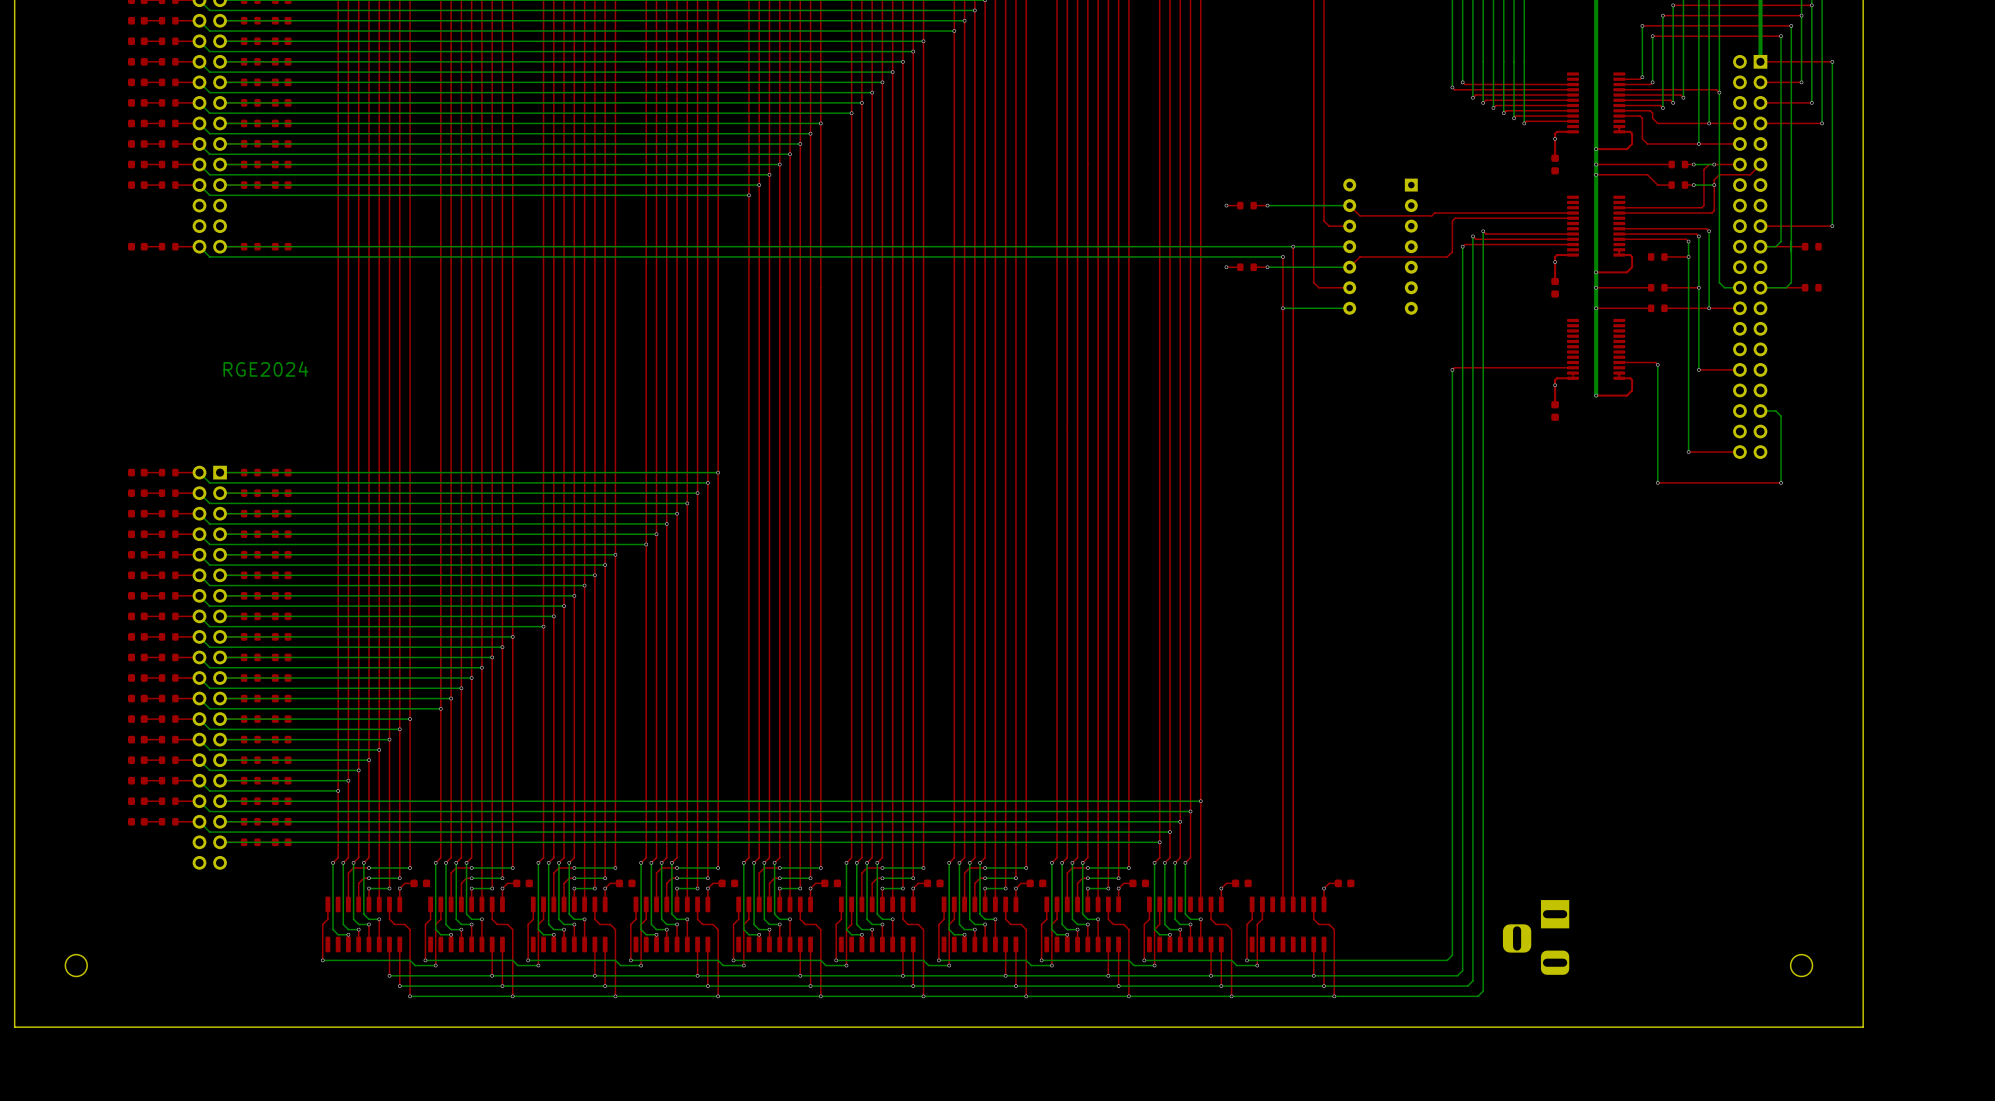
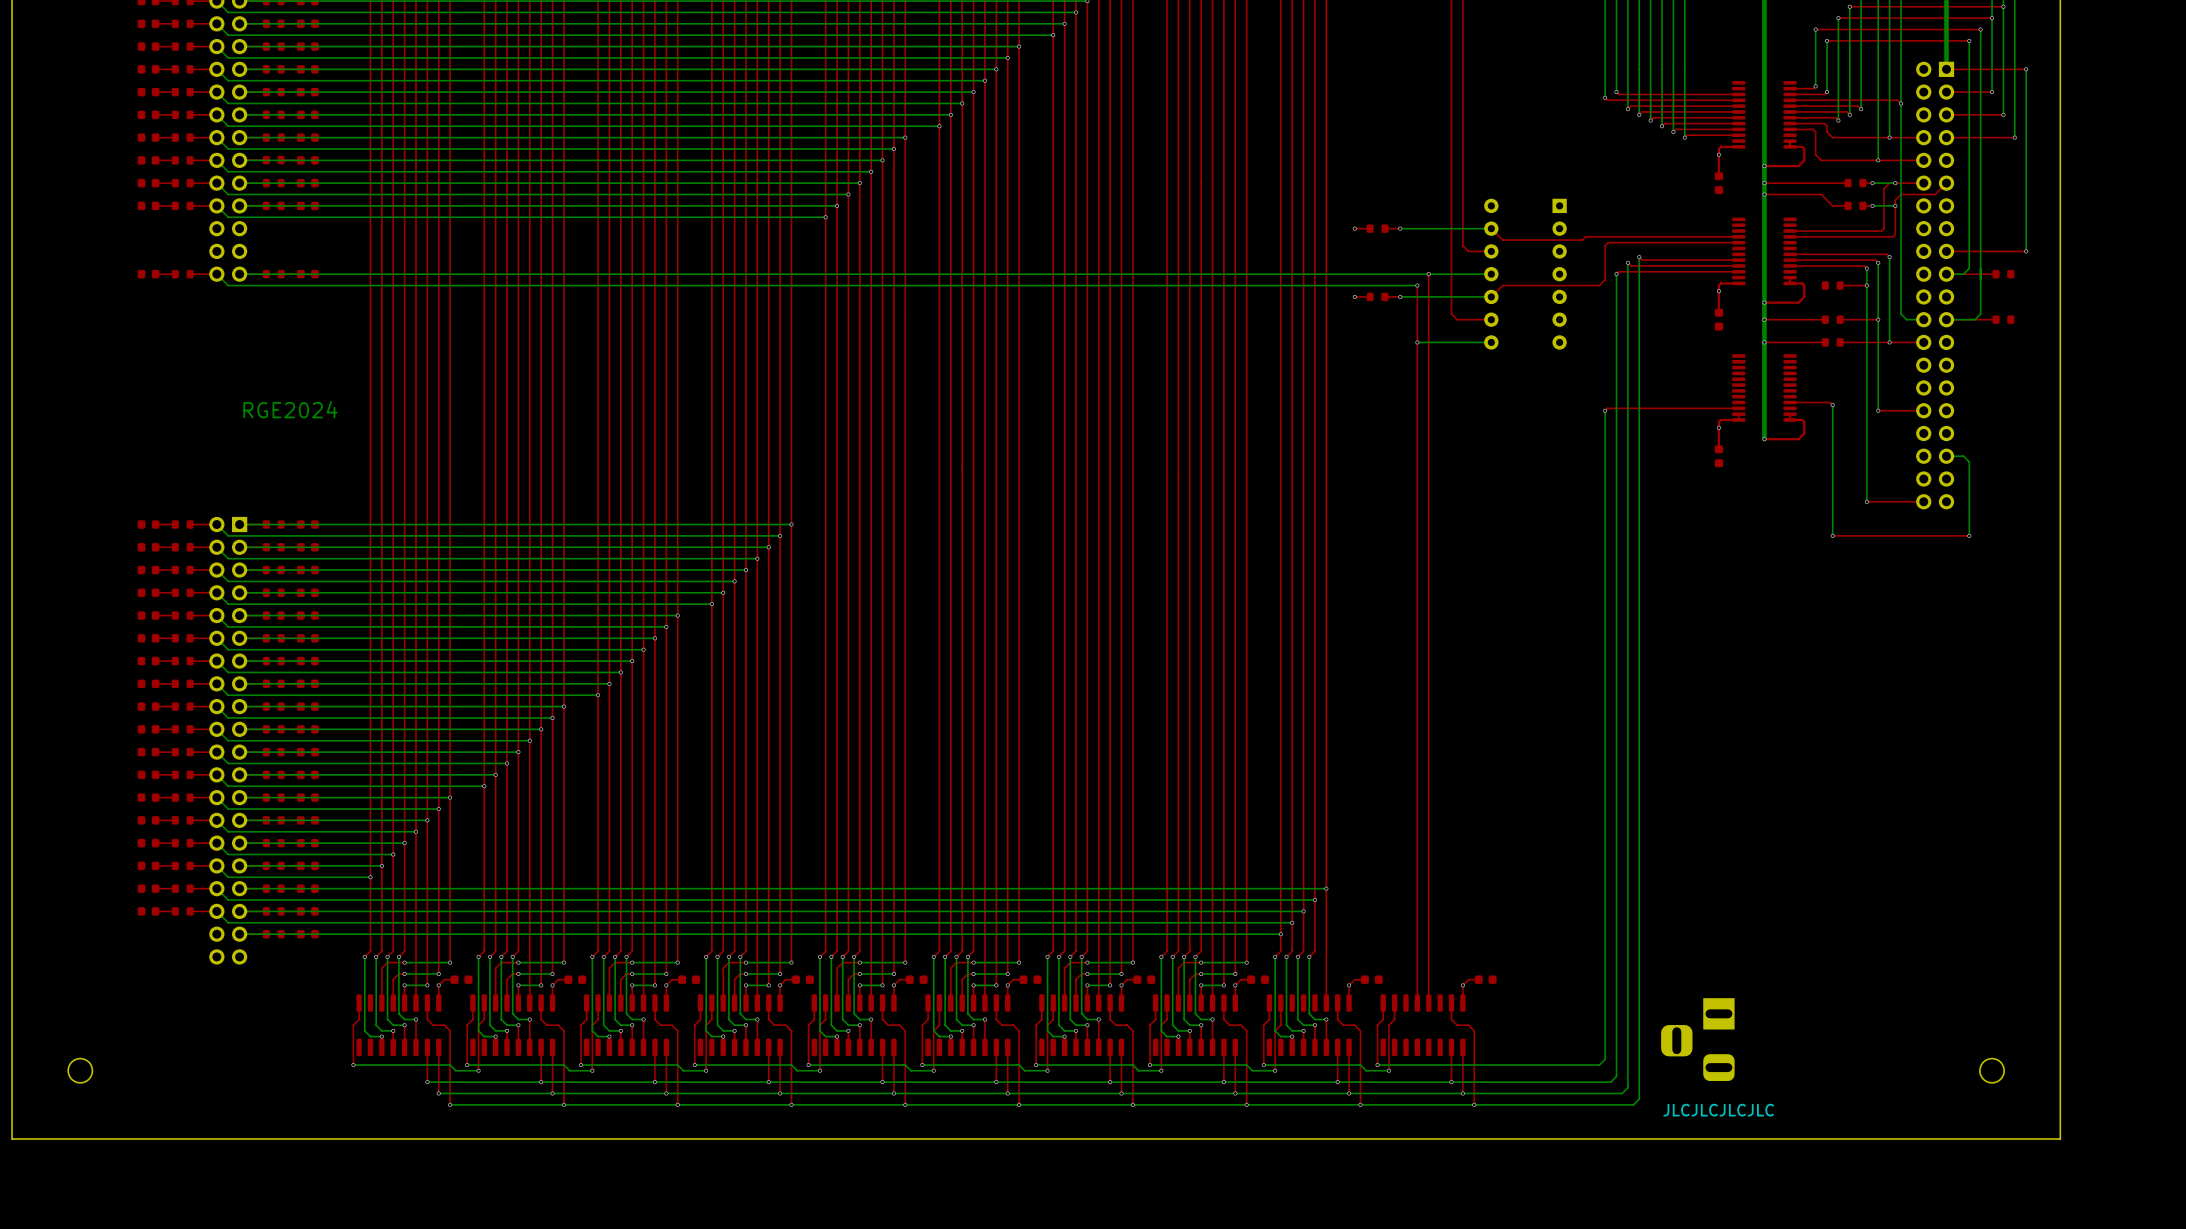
text: none -> JLCJLCJLCJLC (1718, 1110)

